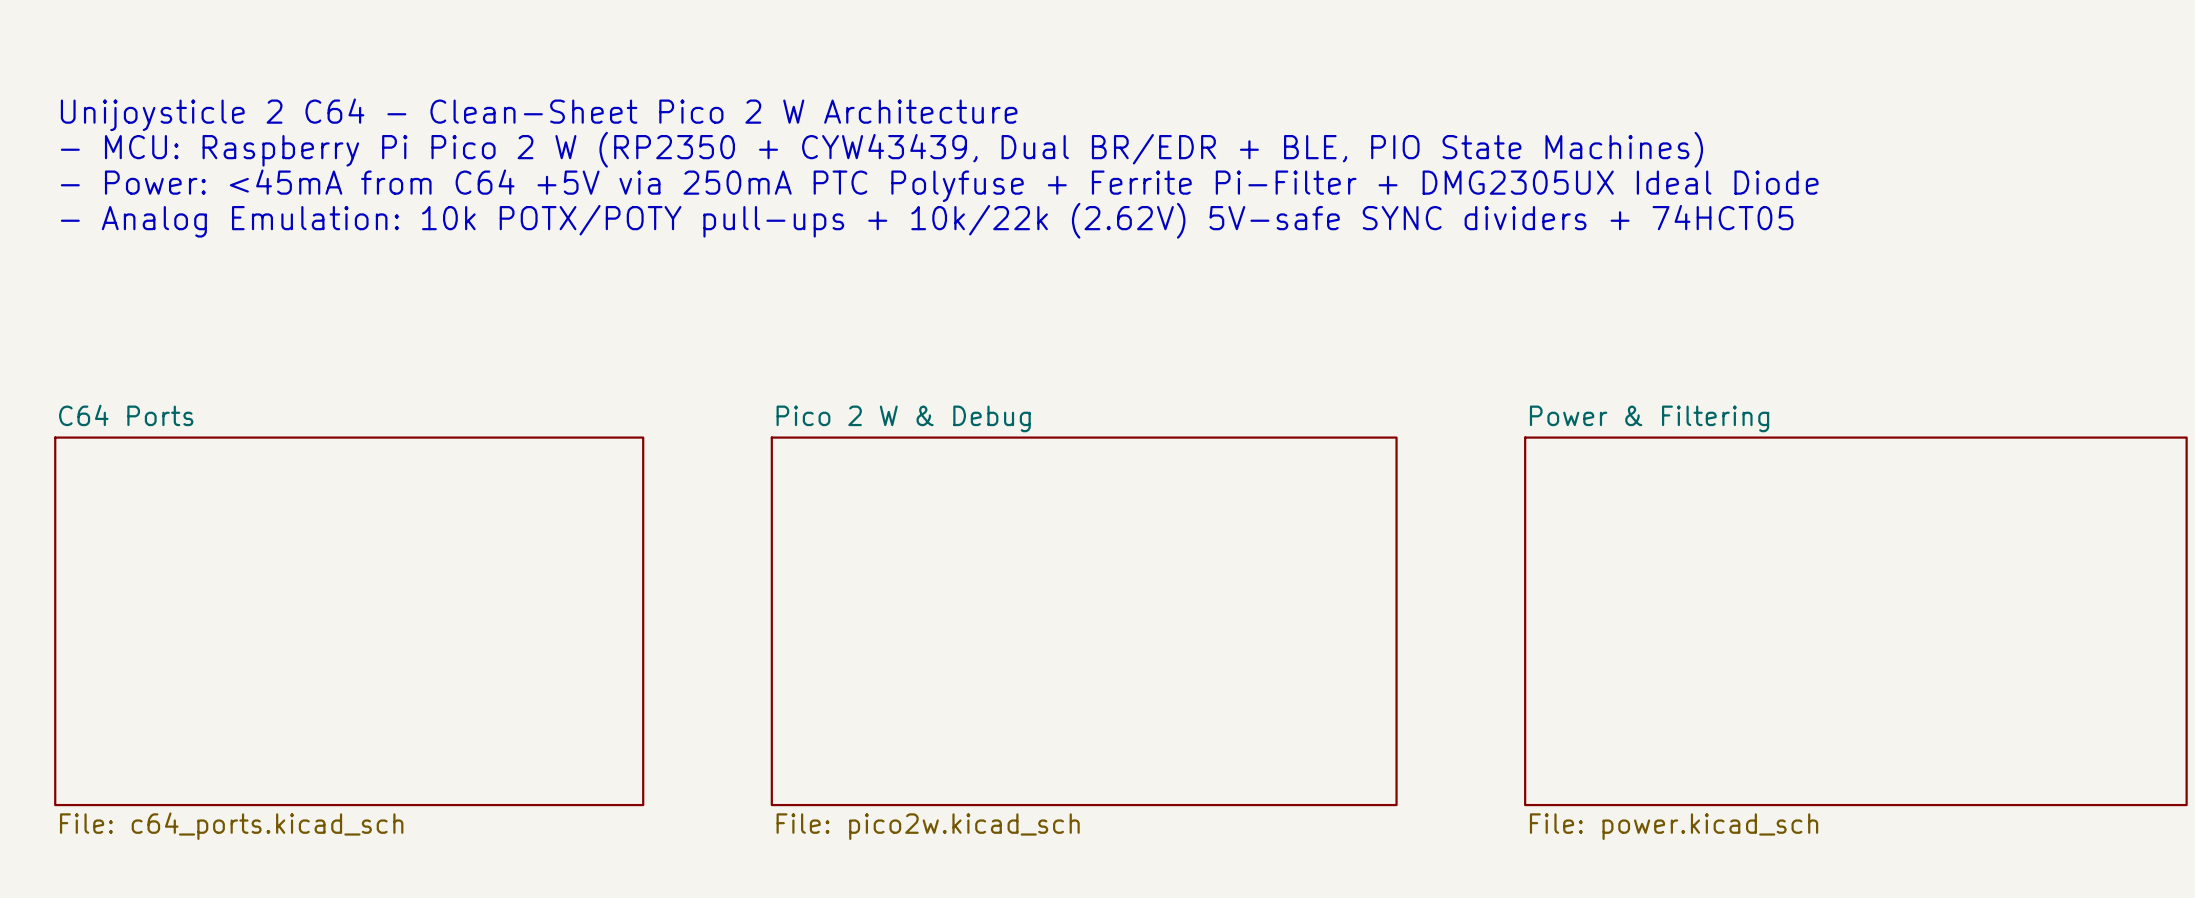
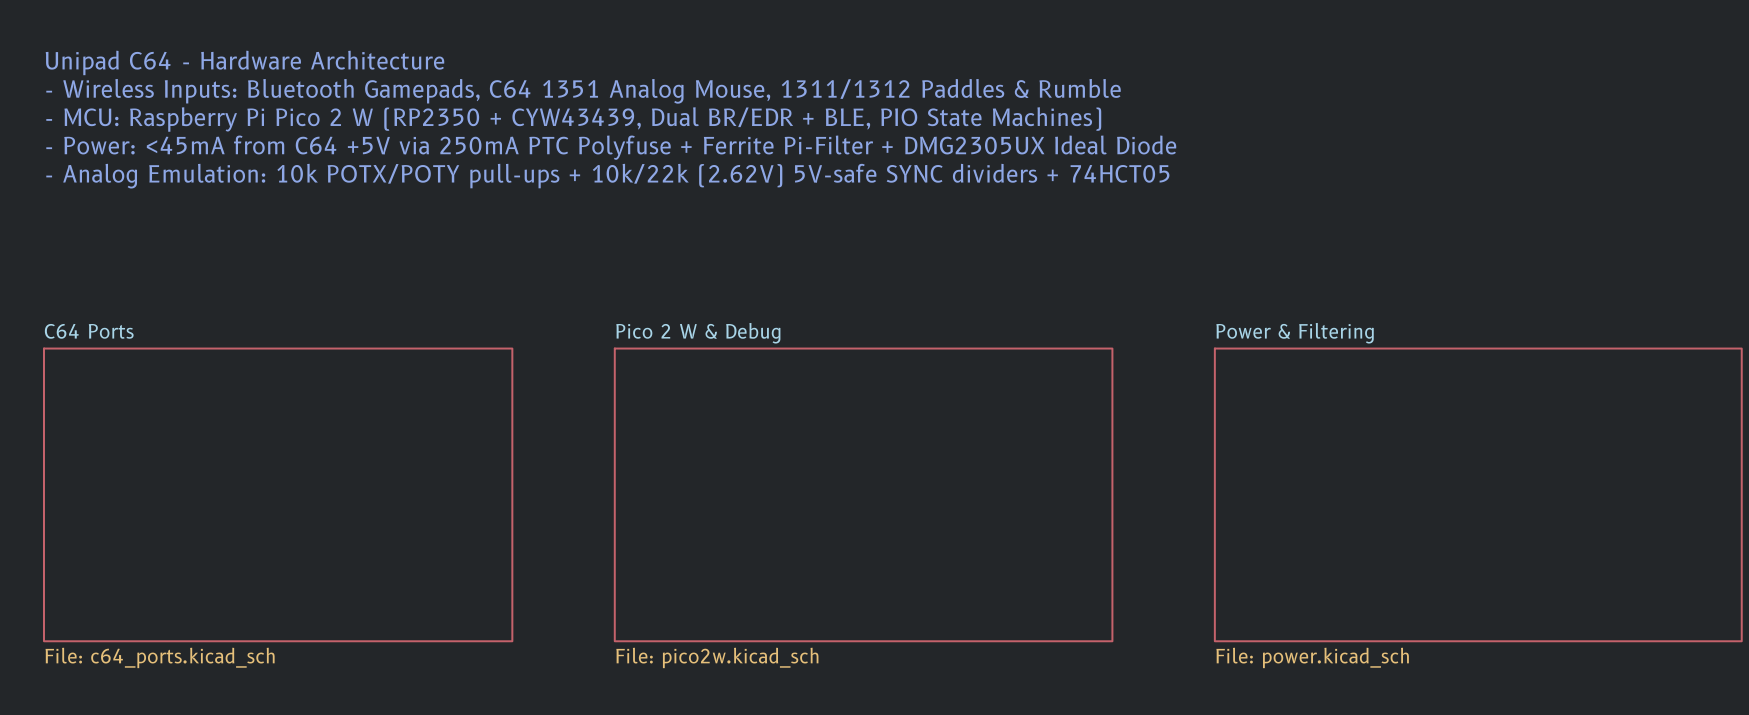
text: none -> Unipad C64 - Hardware Architecture (244, 62)
text: Unijoysticle 2 C64 - Clean-Sheet Pico 2 W Architecture (539, 114) -> - Wireless Inputs: Bluetooth Gamepads, C64 1351 Analog Mouse, 1311/1312 Paddles & Rumble (583, 91)

